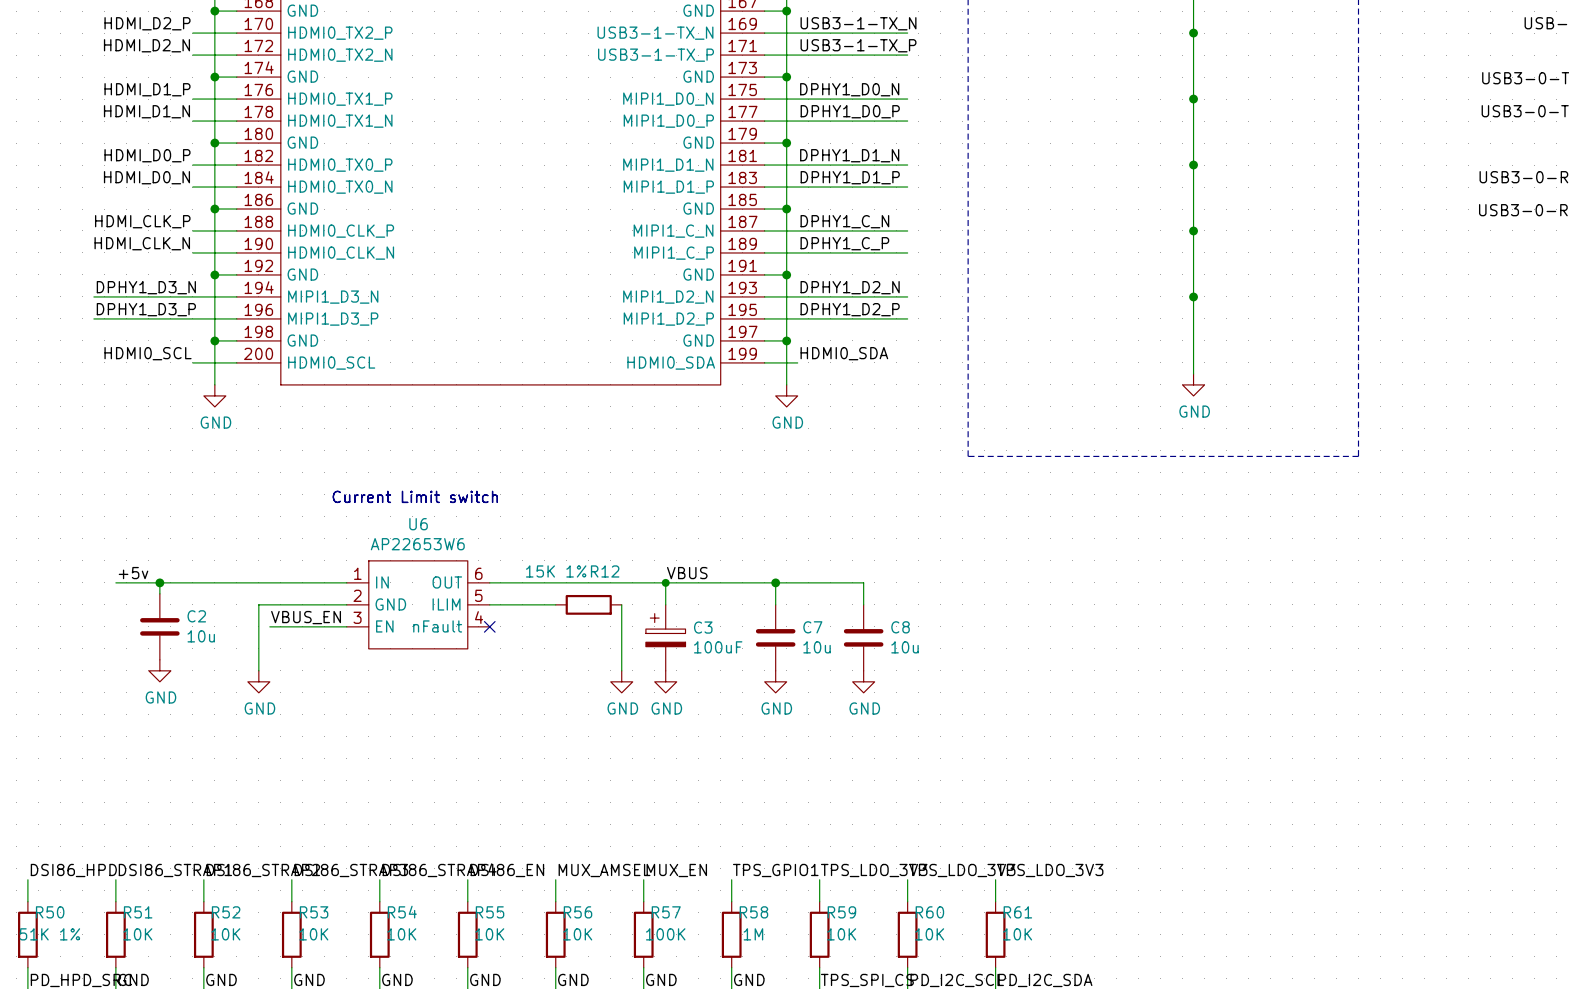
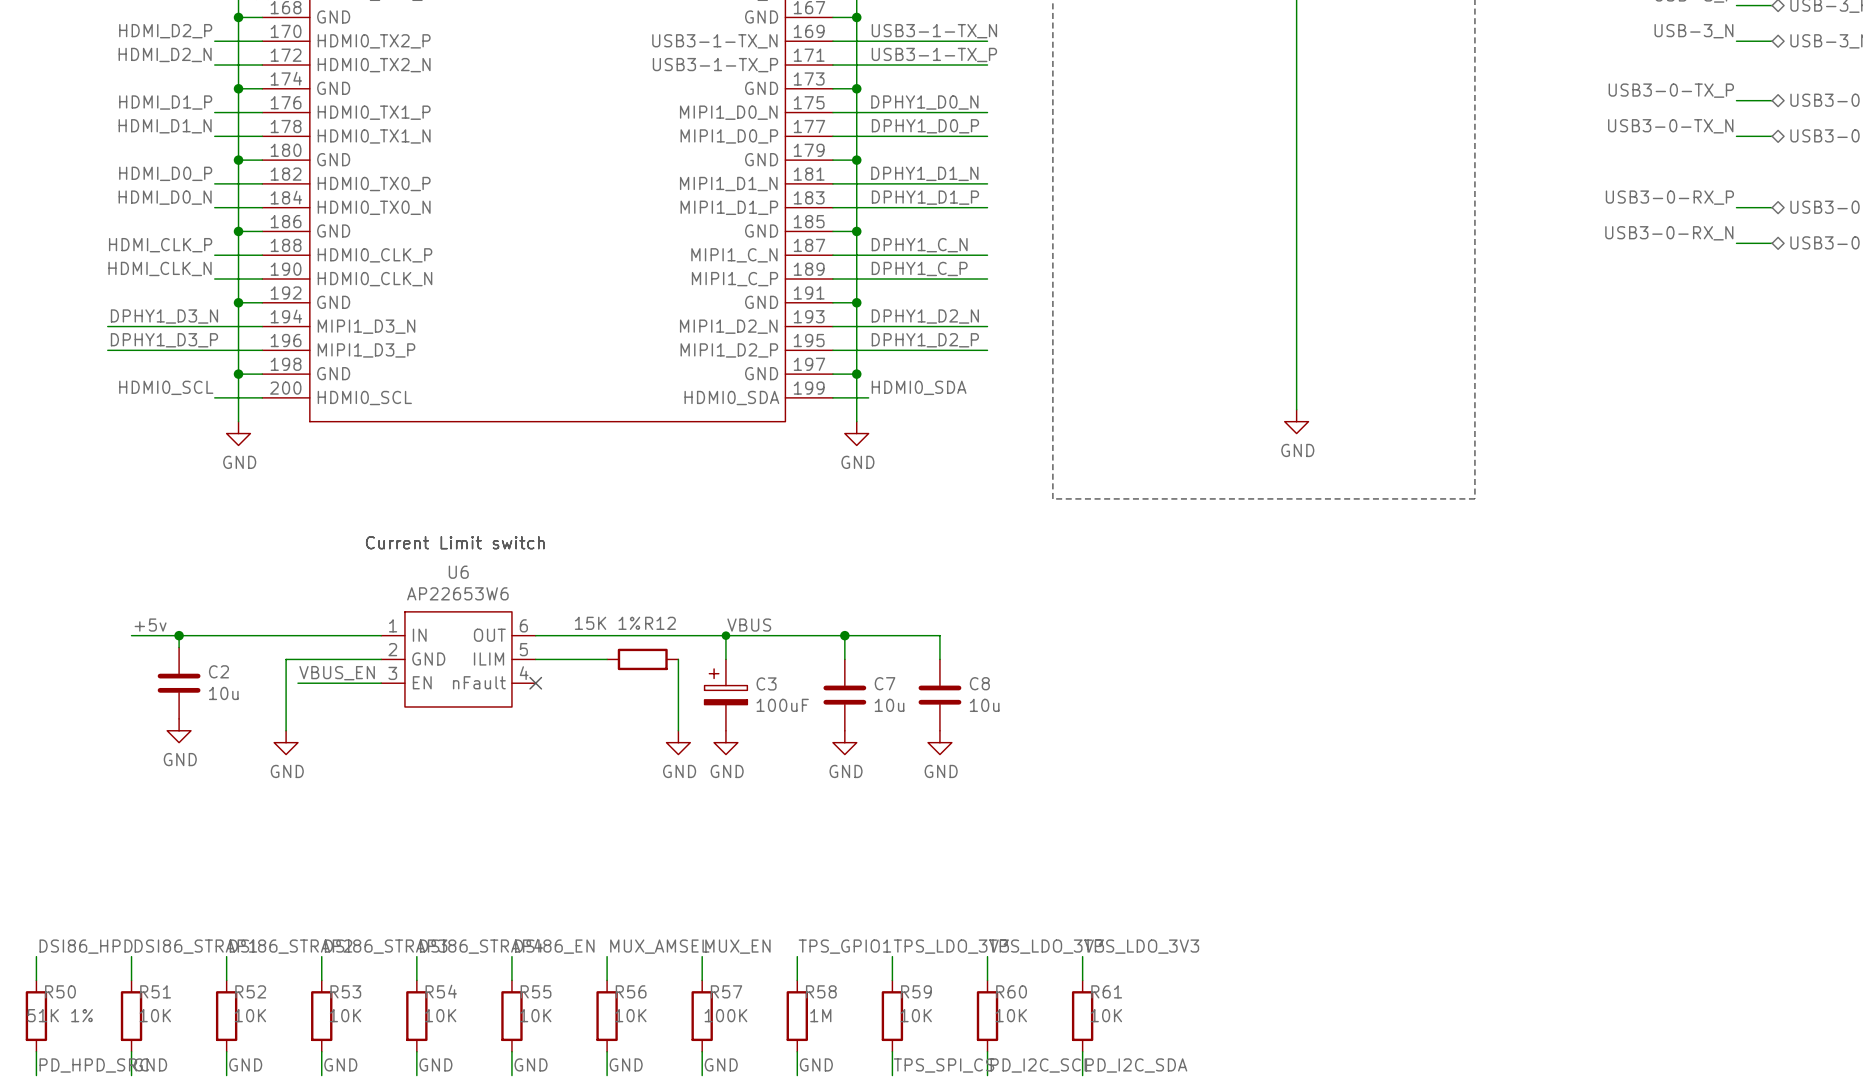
junction: (1193, 33) -> none
junction: (1193, 99) -> none
junction: (1193, 165) -> none
junction: (1193, 230) -> none
junction: (1193, 296) -> none

